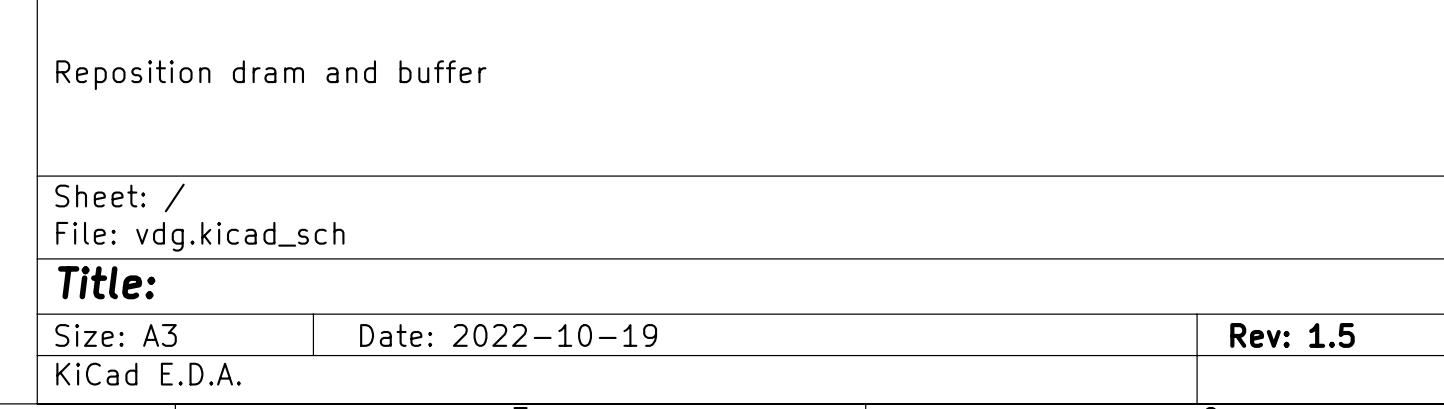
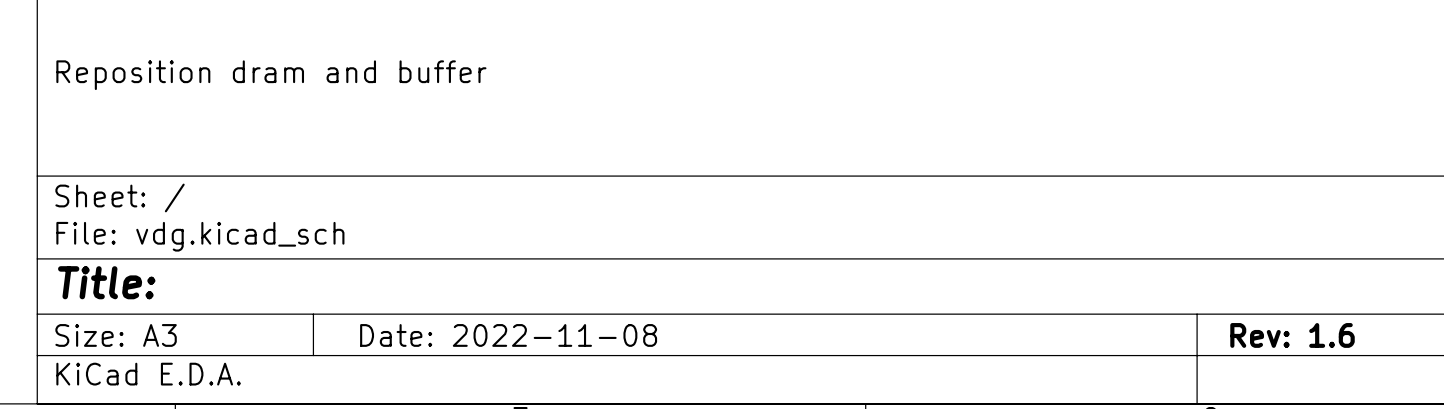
title block: Date: 2022-10-19 (508, 335) -> Date: 2022-11-08 (508, 335)
title block: Rev: 1.5 (1292, 335) -> Rev: 1.6 (1292, 335)

